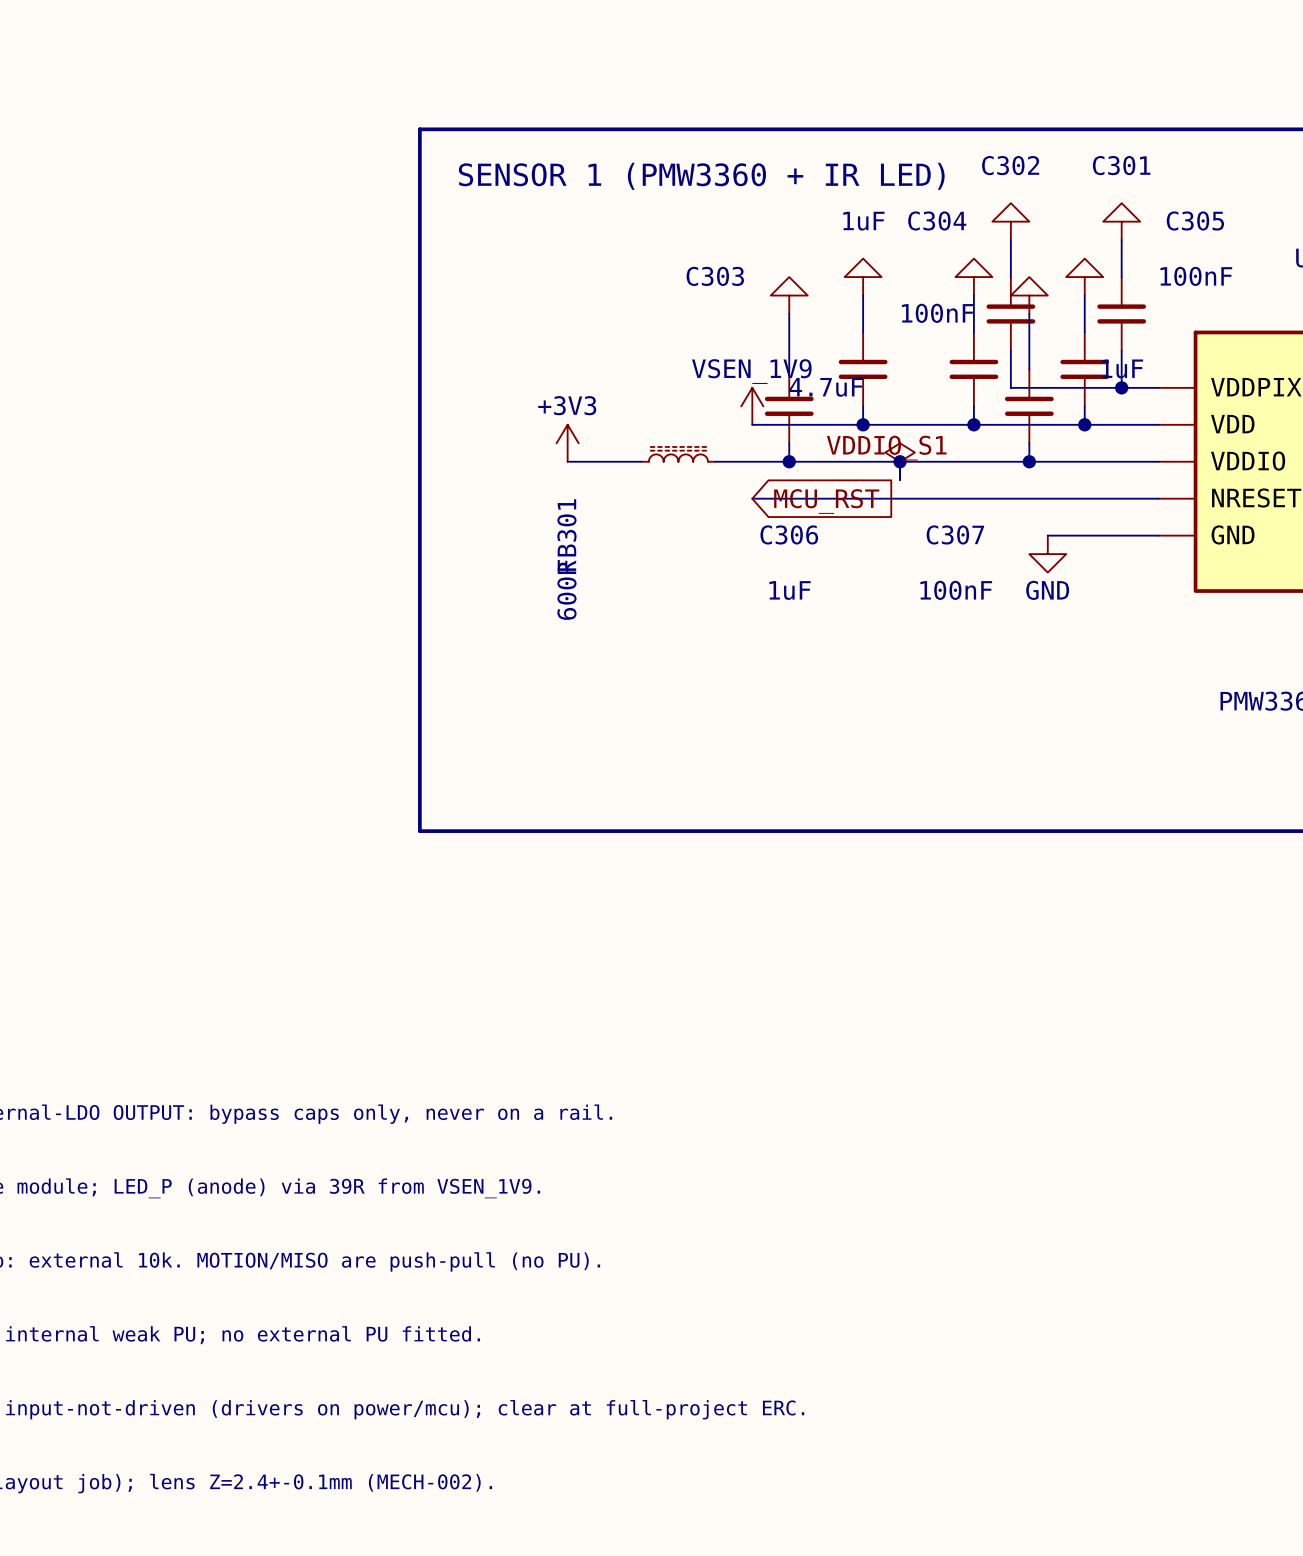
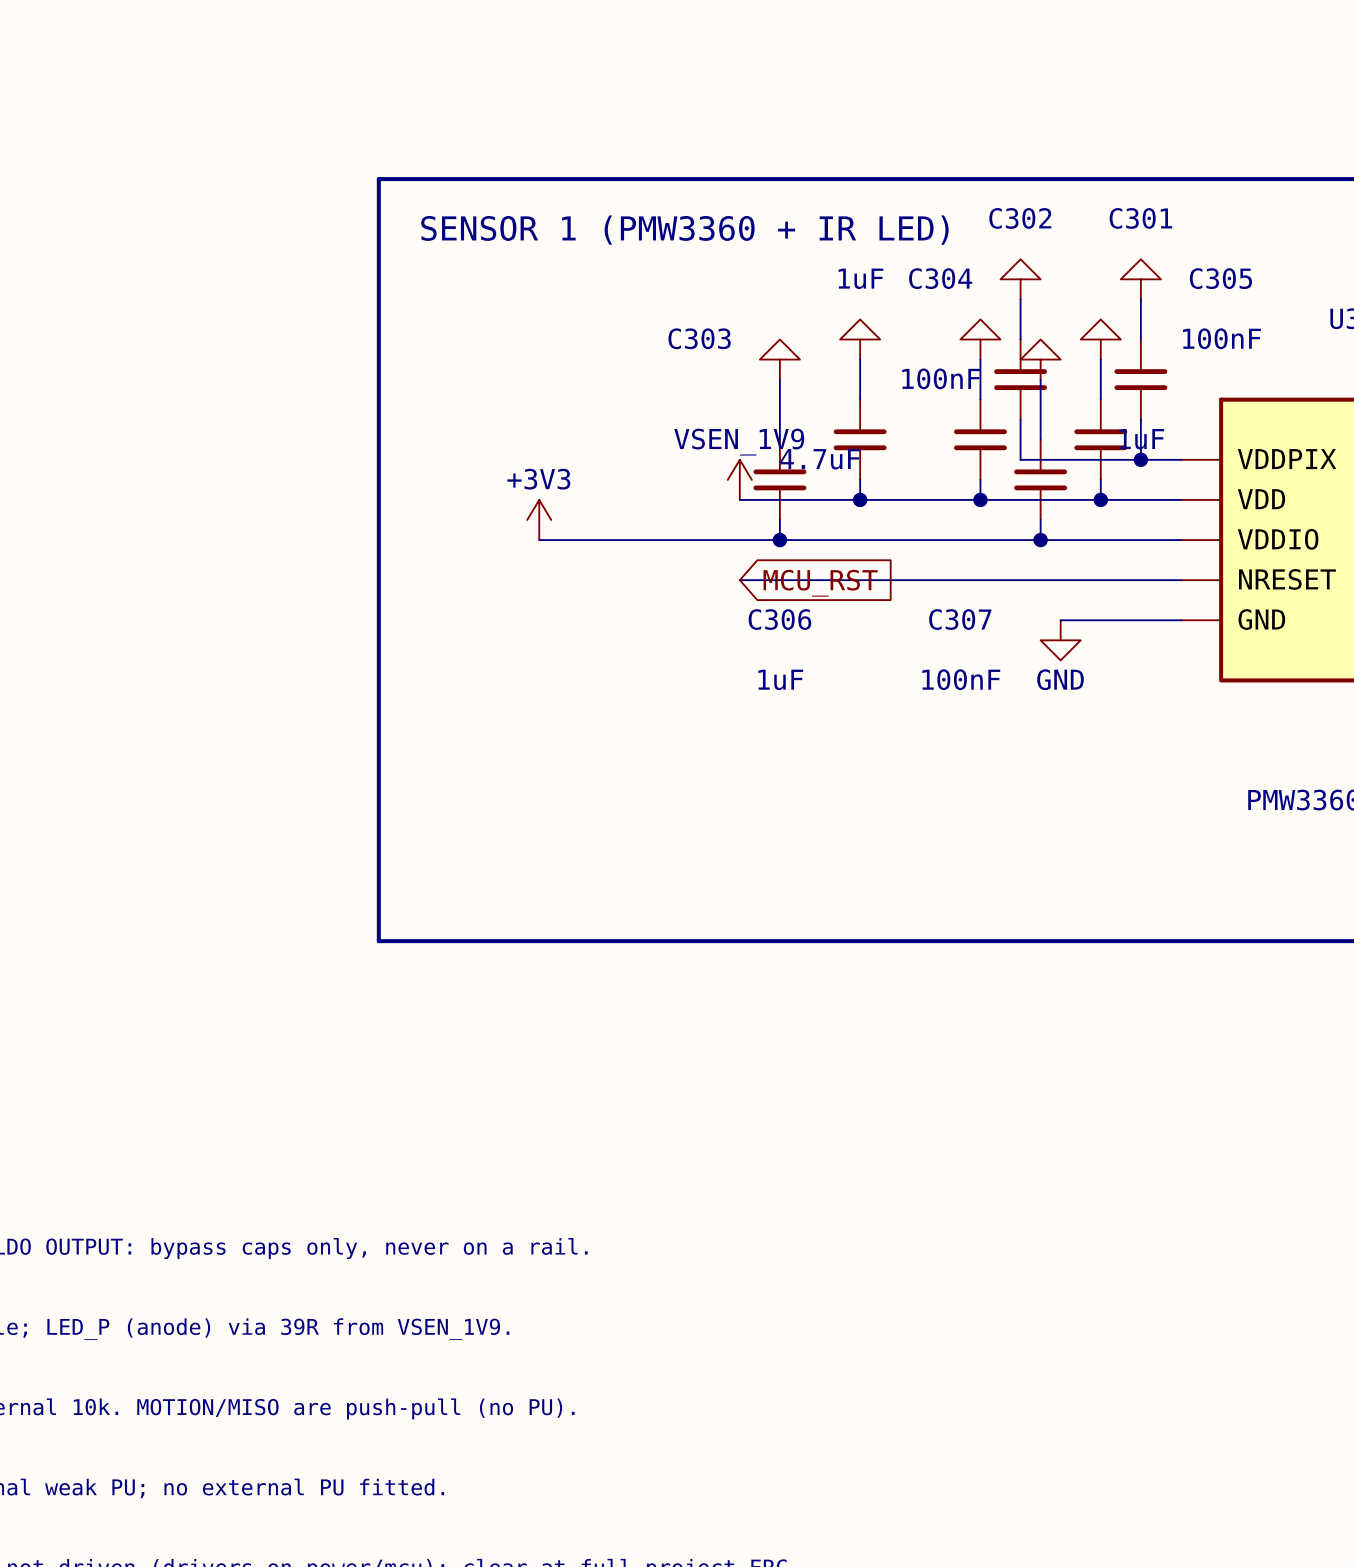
label: VDDIO_S1 (886, 448) -> none
FB301: 600R (678, 454) -> none
wire: none -> (619, 540) (699, 540)
wire: (900, 461) (900, 480) -> none
power symbol: (900, 461) -> none
junction: (900, 461) -> none

